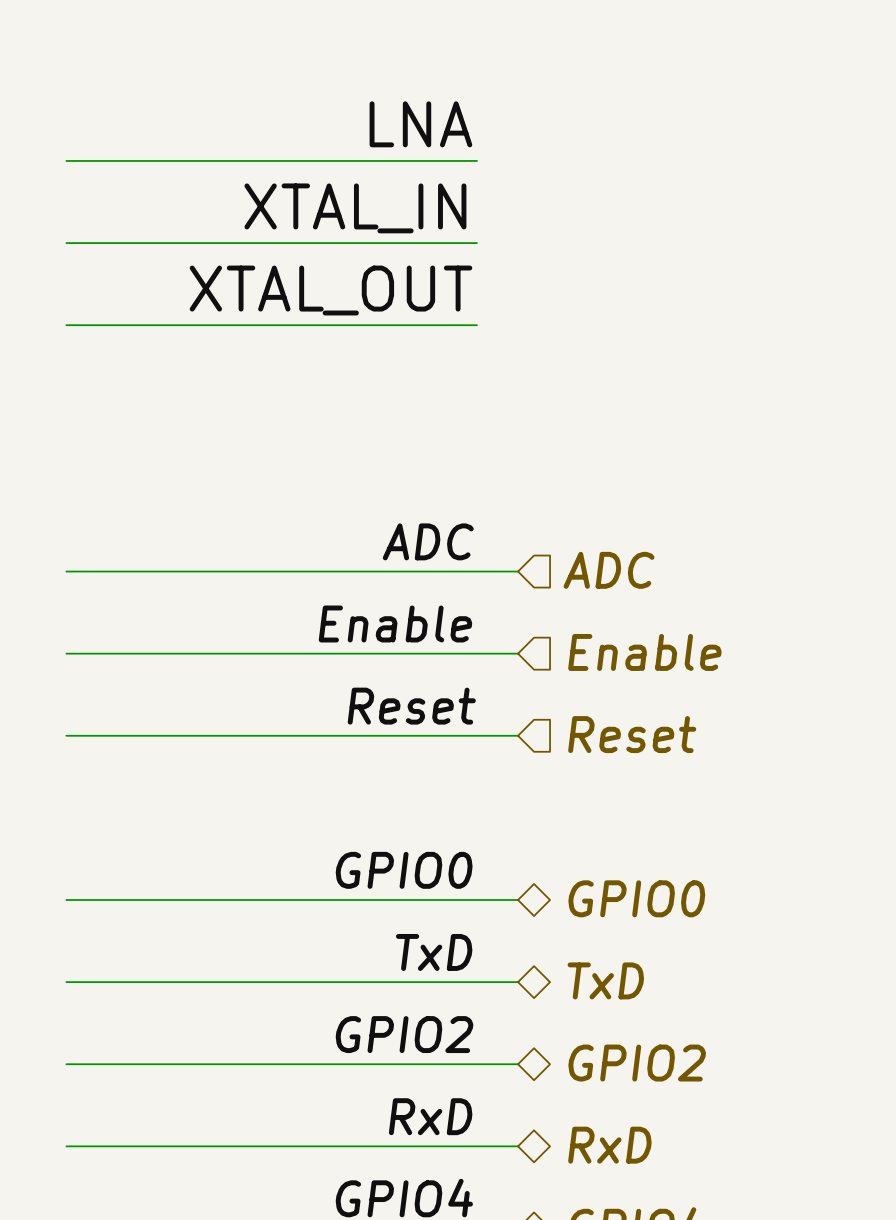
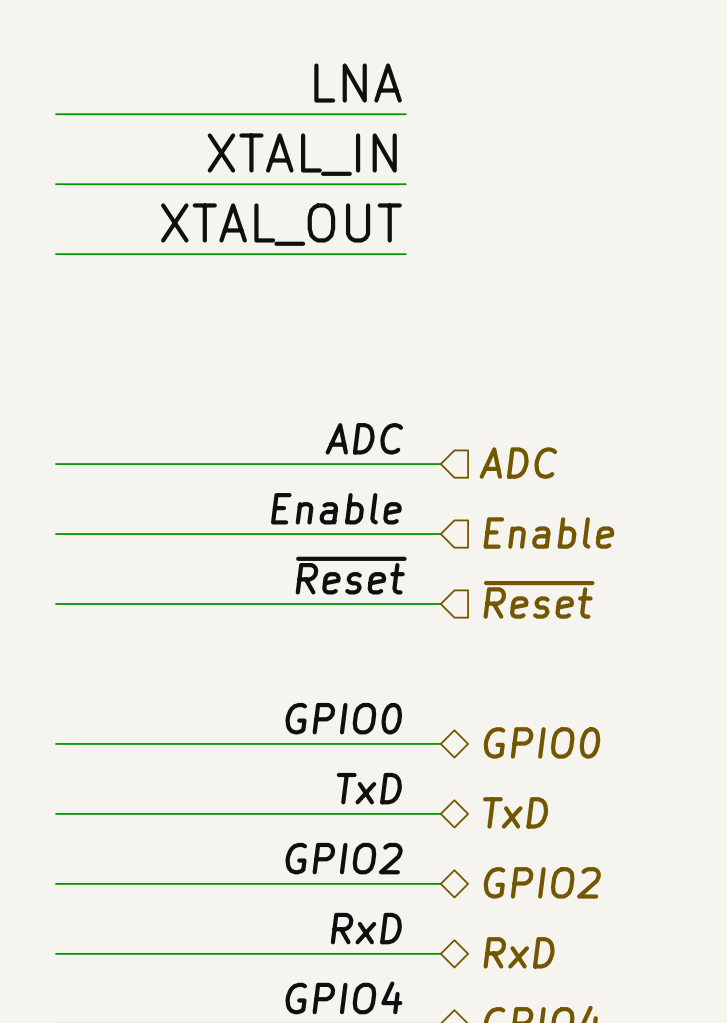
label: Reset (411, 706) -> ~{Reset} (351, 575)
hierarchical label: Reset (632, 734) -> ~{Reset} (538, 599)

